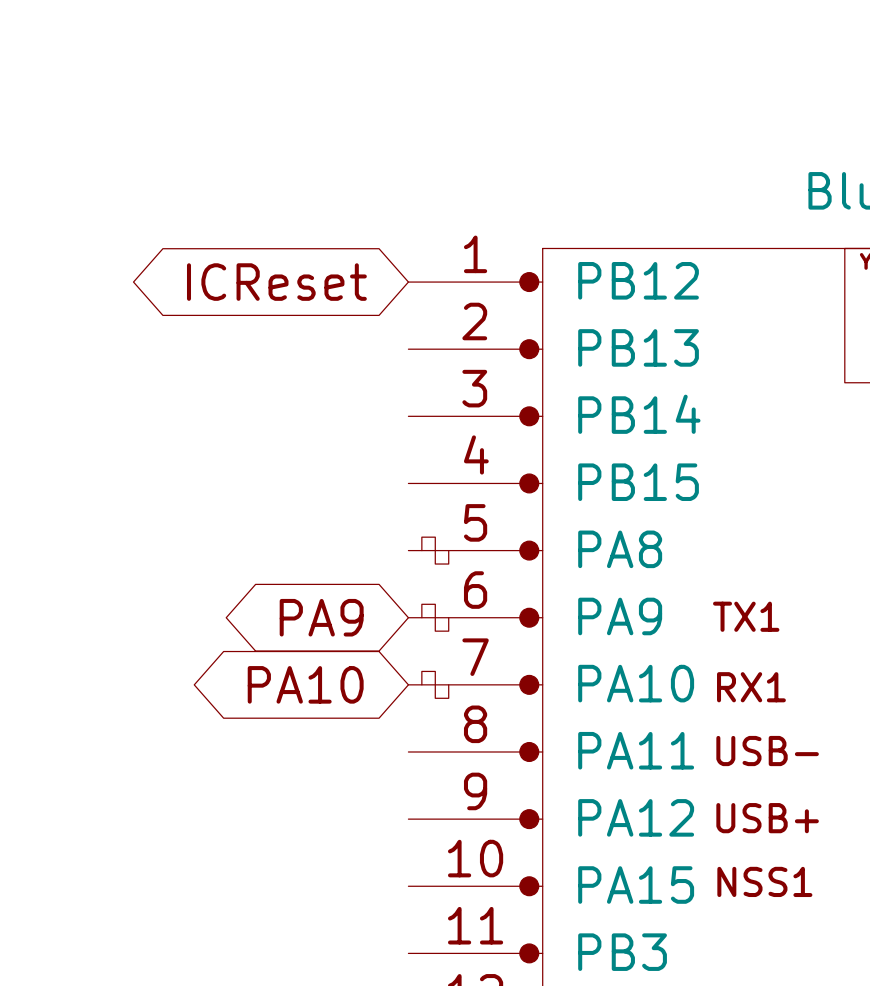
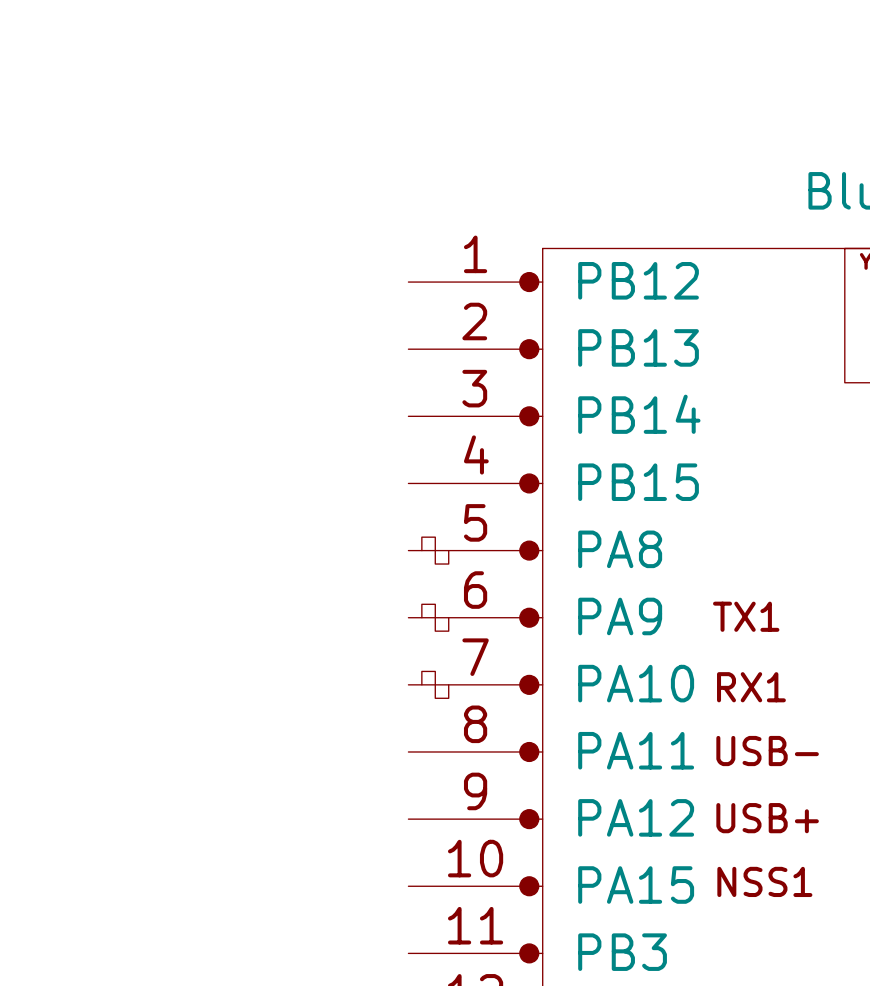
global label: ICReset (276, 282) -> none
global label: PA9 (321, 617) -> none
global label: PA10 (305, 684) -> none

